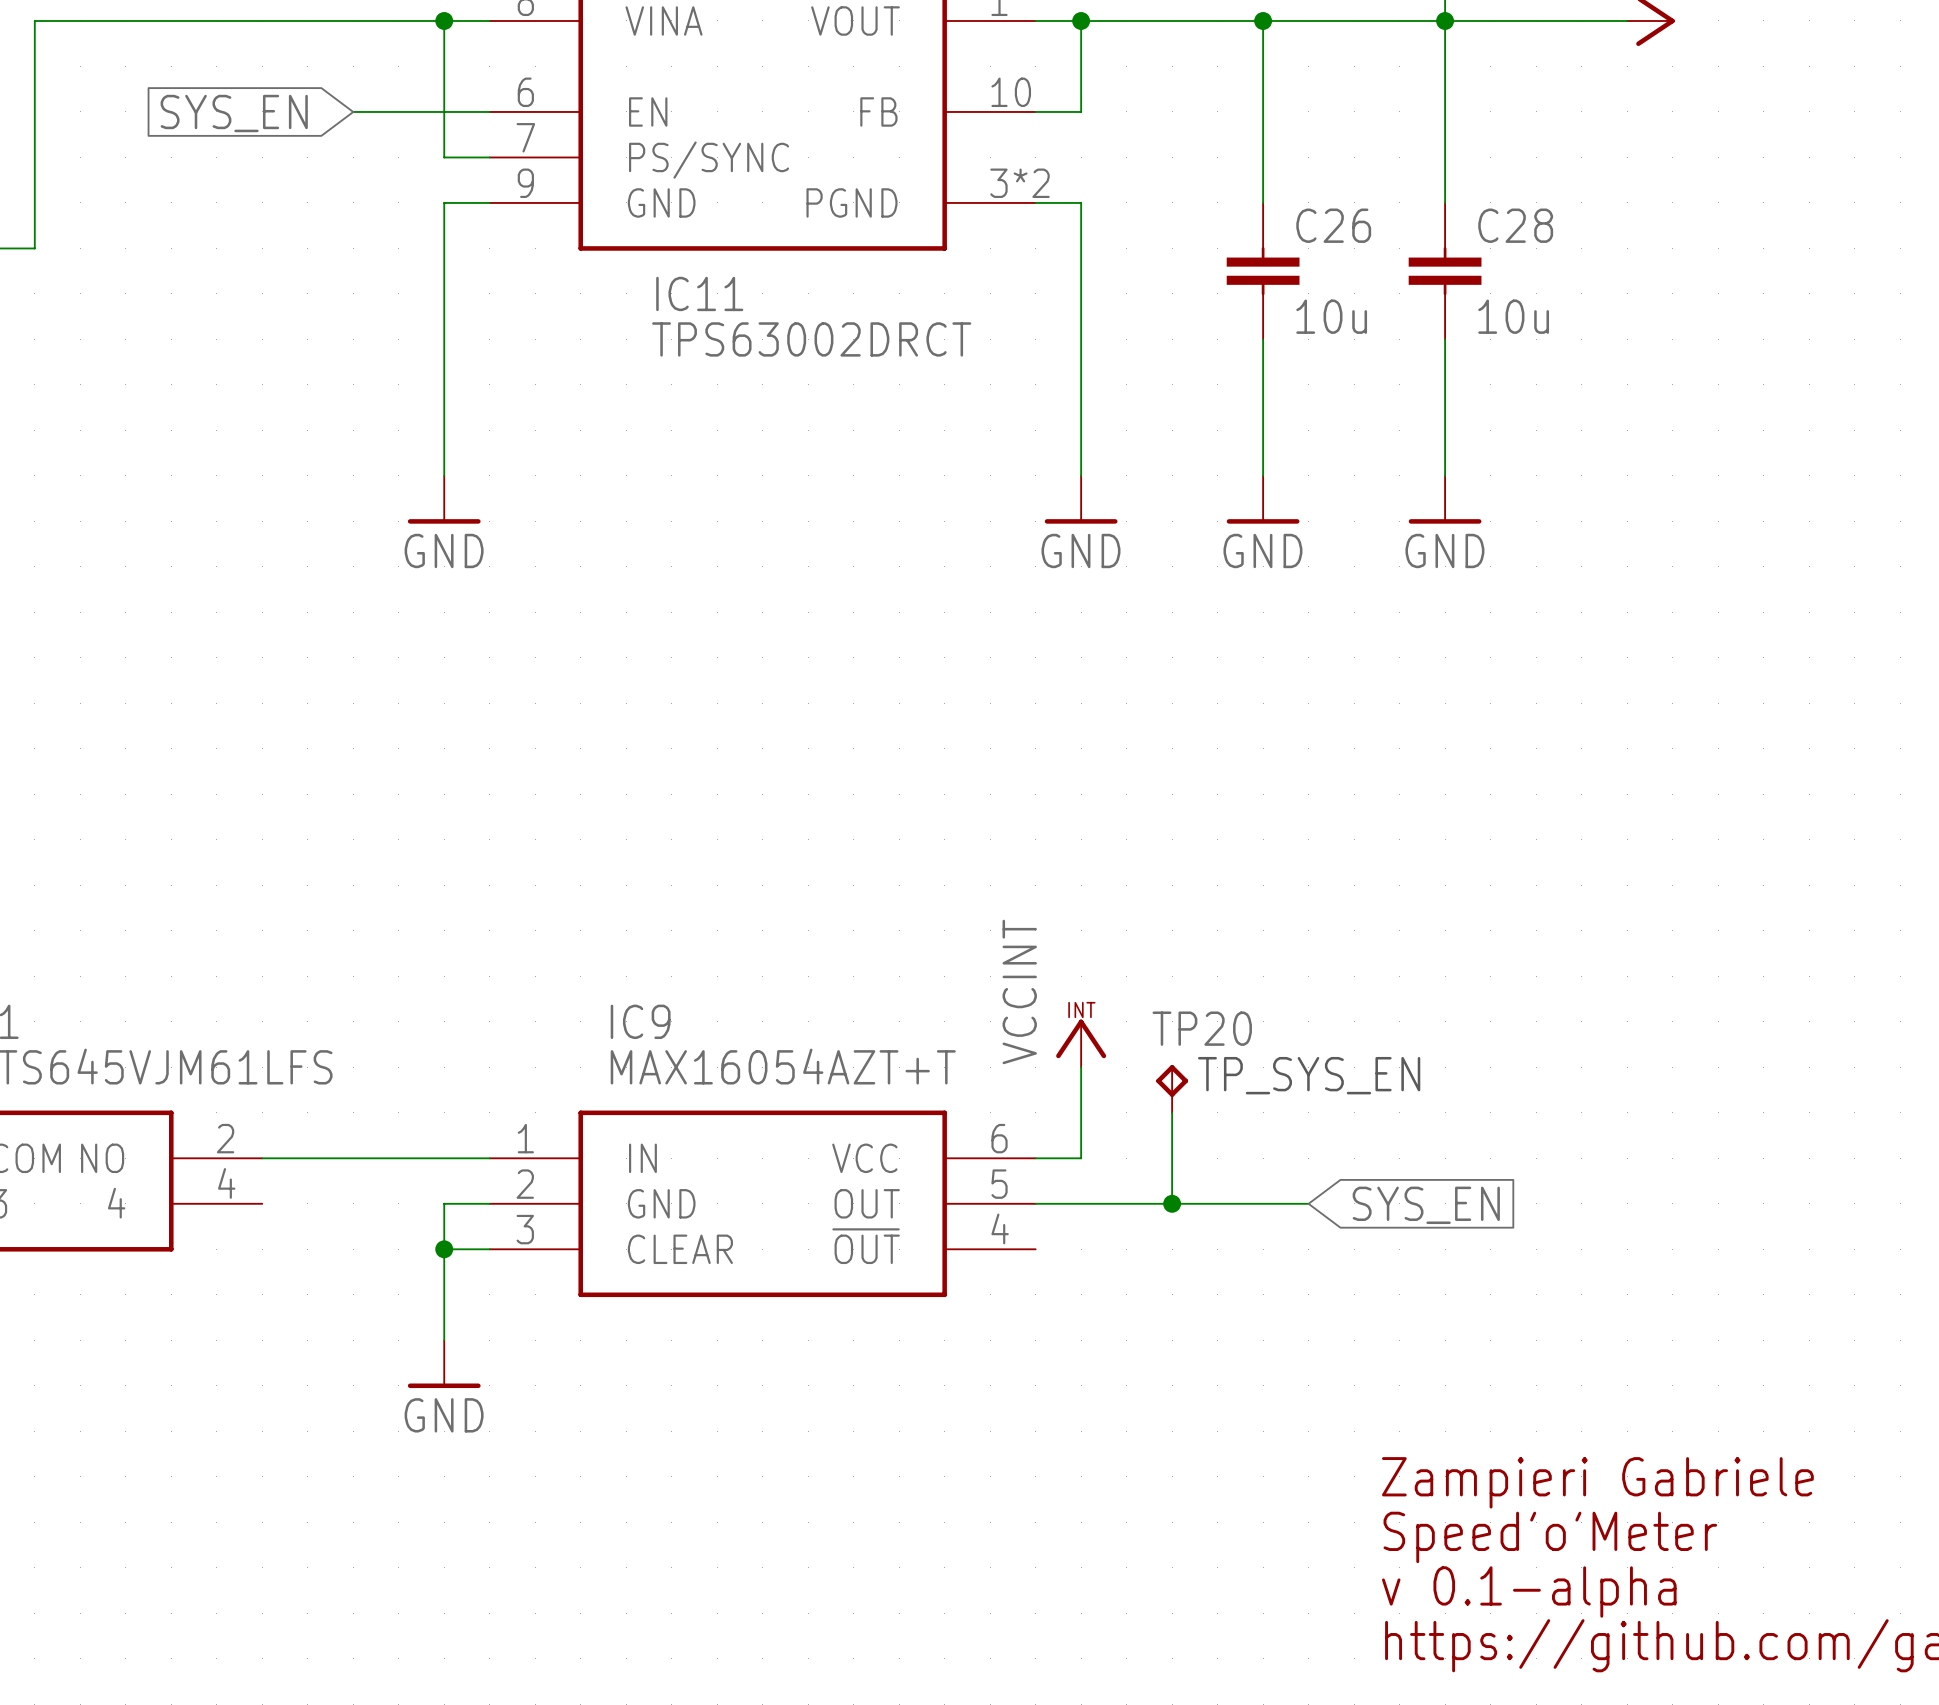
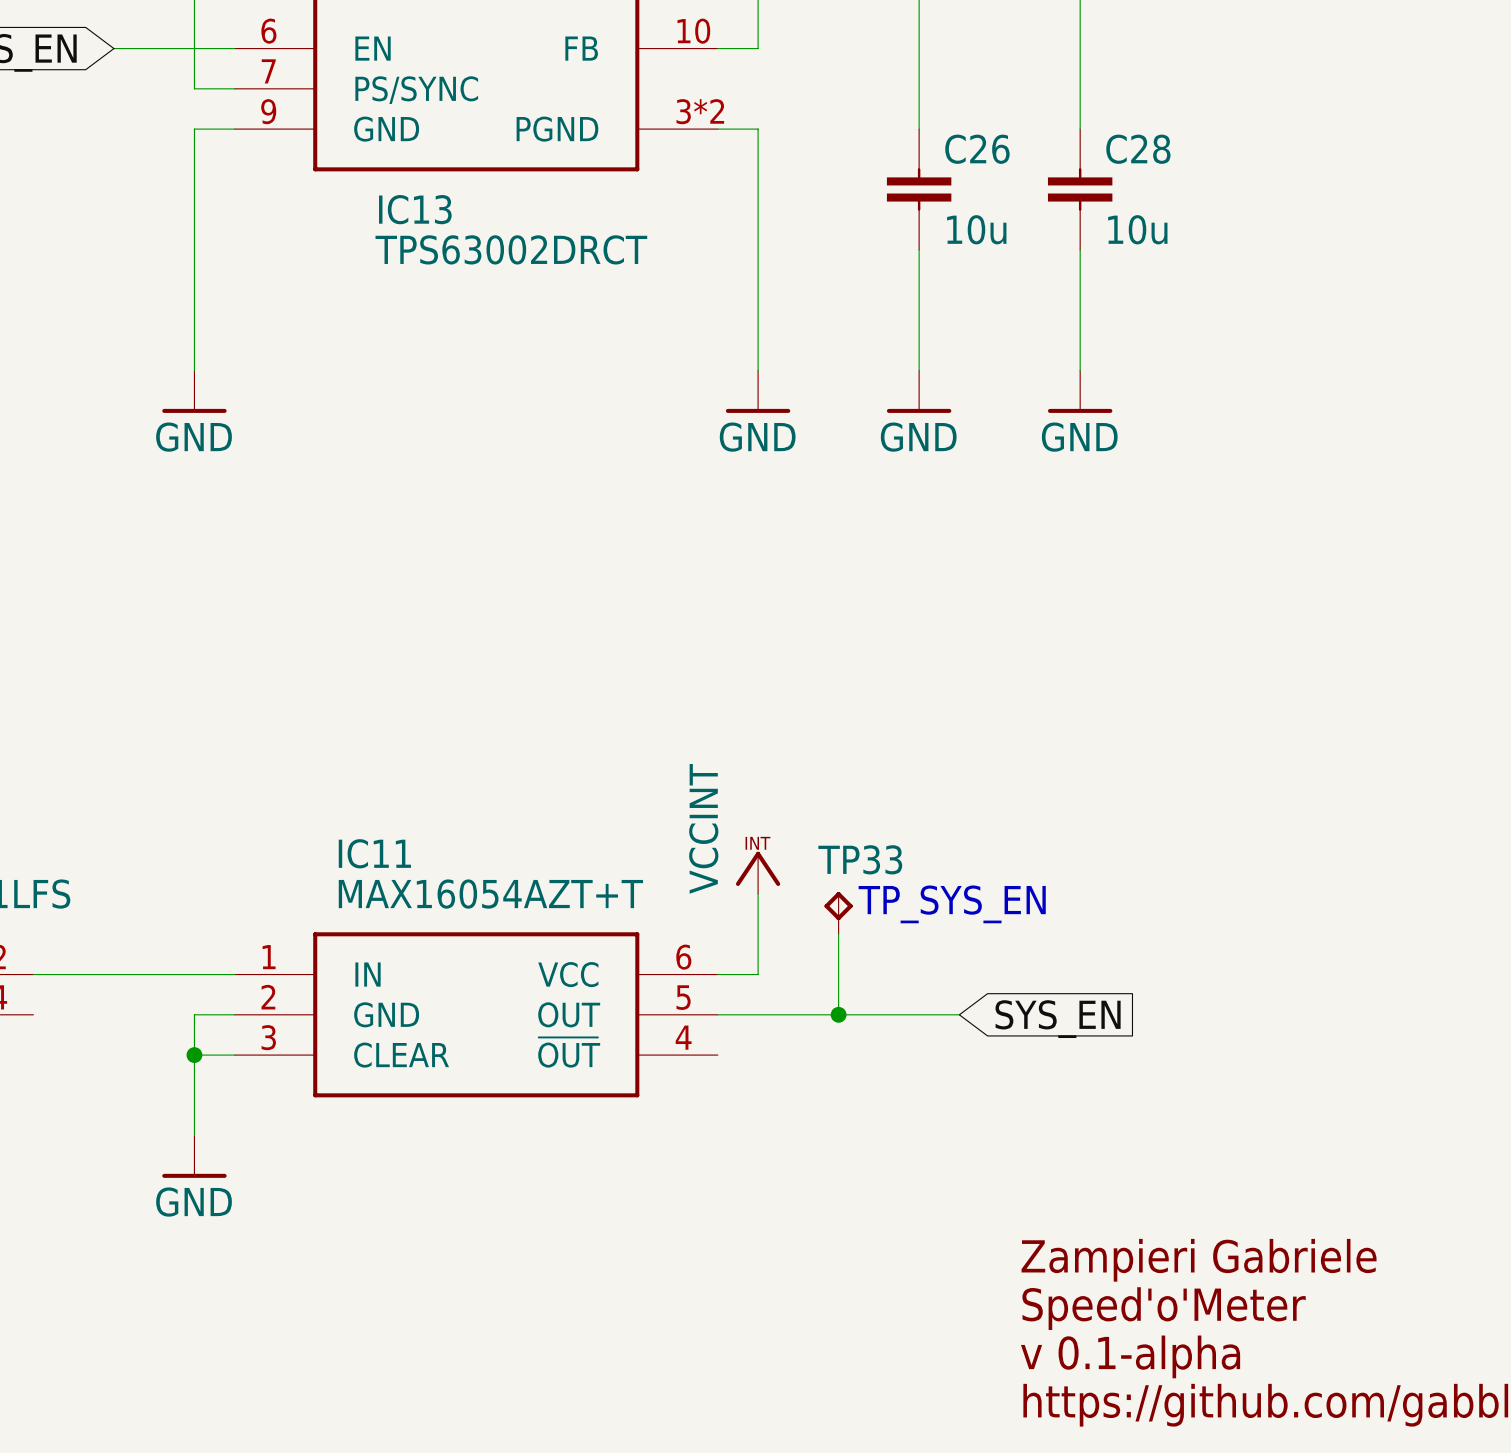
IC11 name: IC11 (699, 293) -> IC13 (415, 209)
IC9 name: IC9 (640, 1021) -> IC11 (374, 853)
TP20 name: TP20 (1202, 1028) -> TP33 (860, 859)

